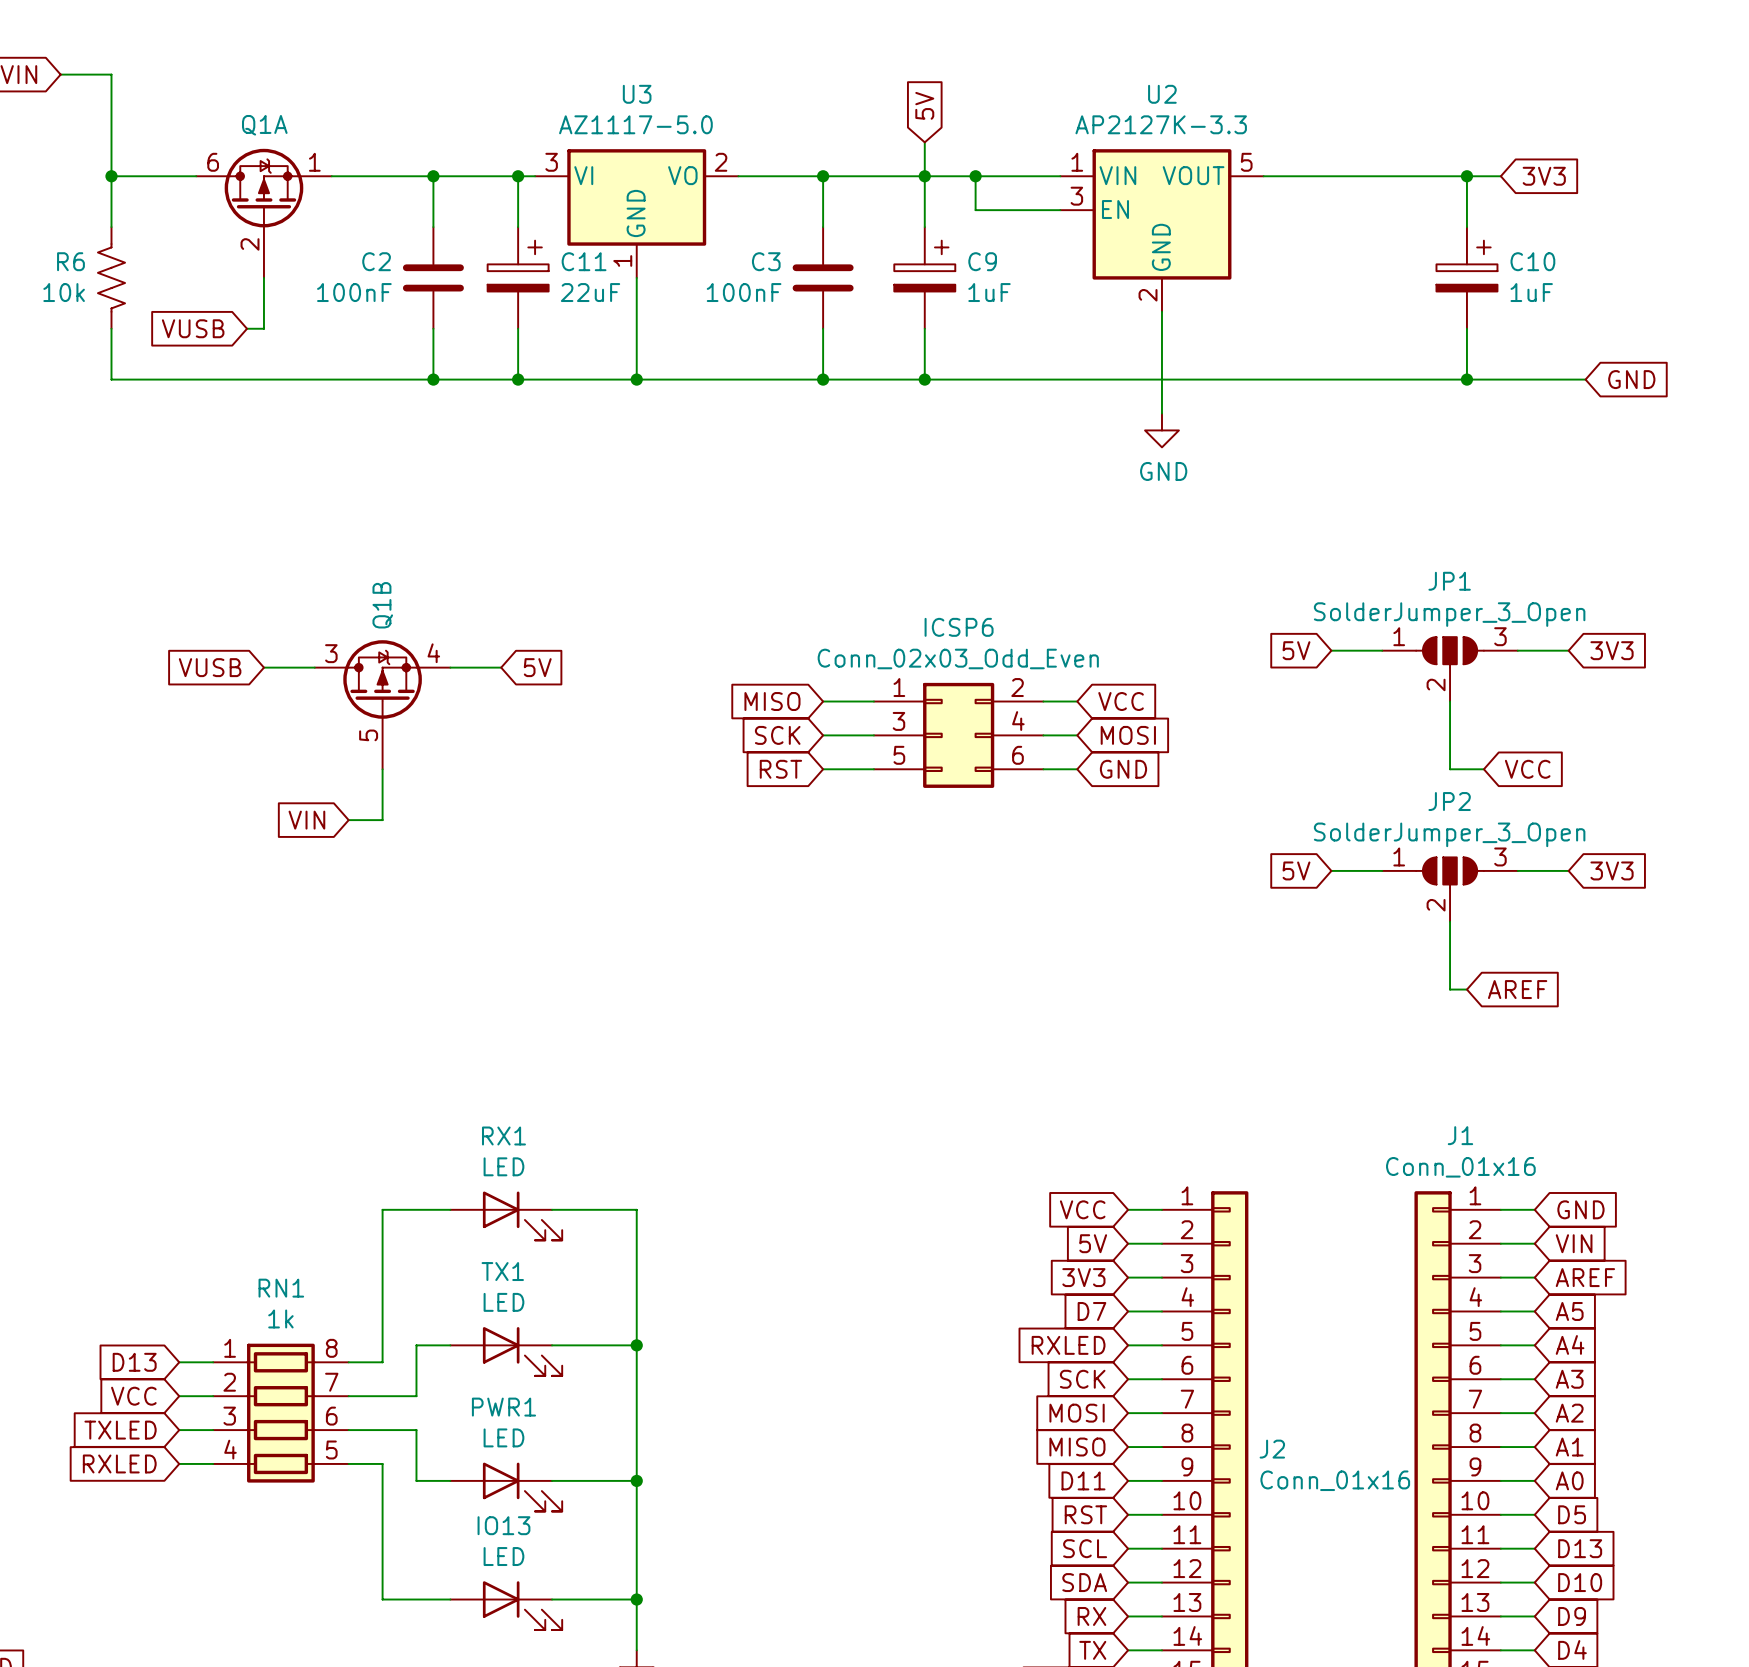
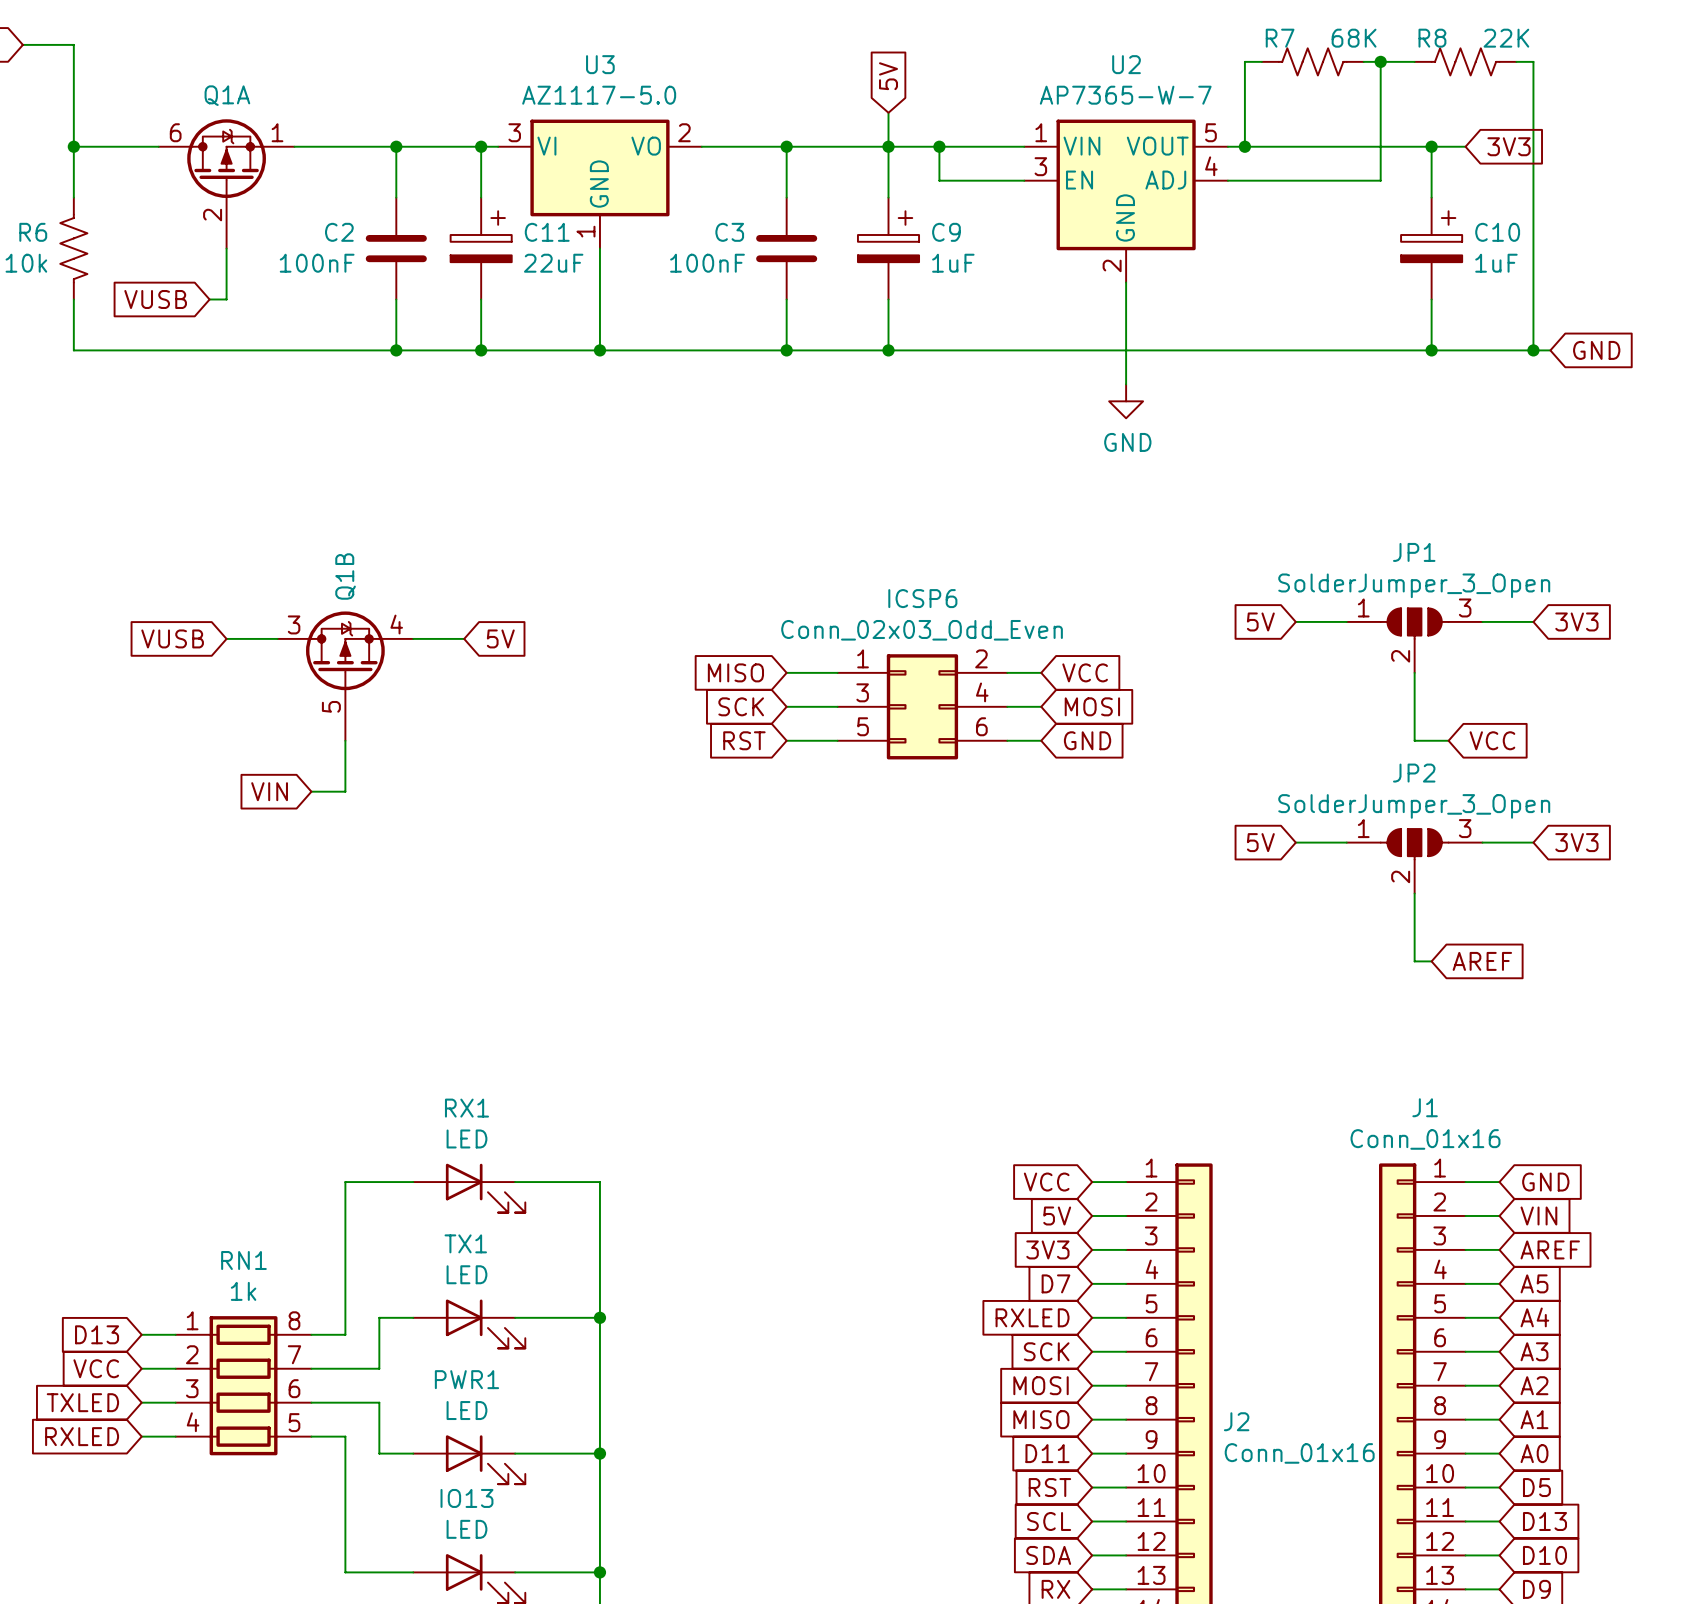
wire: none -> (1261, 61) (1244, 61) (1244, 146)
R7: none -> 68K (1312, 61)
wire: none -> (1363, 61) (1414, 61)
wire: none -> (1380, 61) (1380, 180) (1227, 180)
junction: none -> (1380, 61)
R8: none -> 22K (1465, 61)
wire: none -> (1516, 61) (1533, 61) (1533, 350)
U2 value: AP2127K-3.3 (1161, 124) -> AP7365-W-7 (1125, 95)
U2 symbol: [1060, 149, 1264, 312] -> [1024, 119, 1228, 283]
junction: none -> (1244, 146)
junction: none -> (1533, 350)

